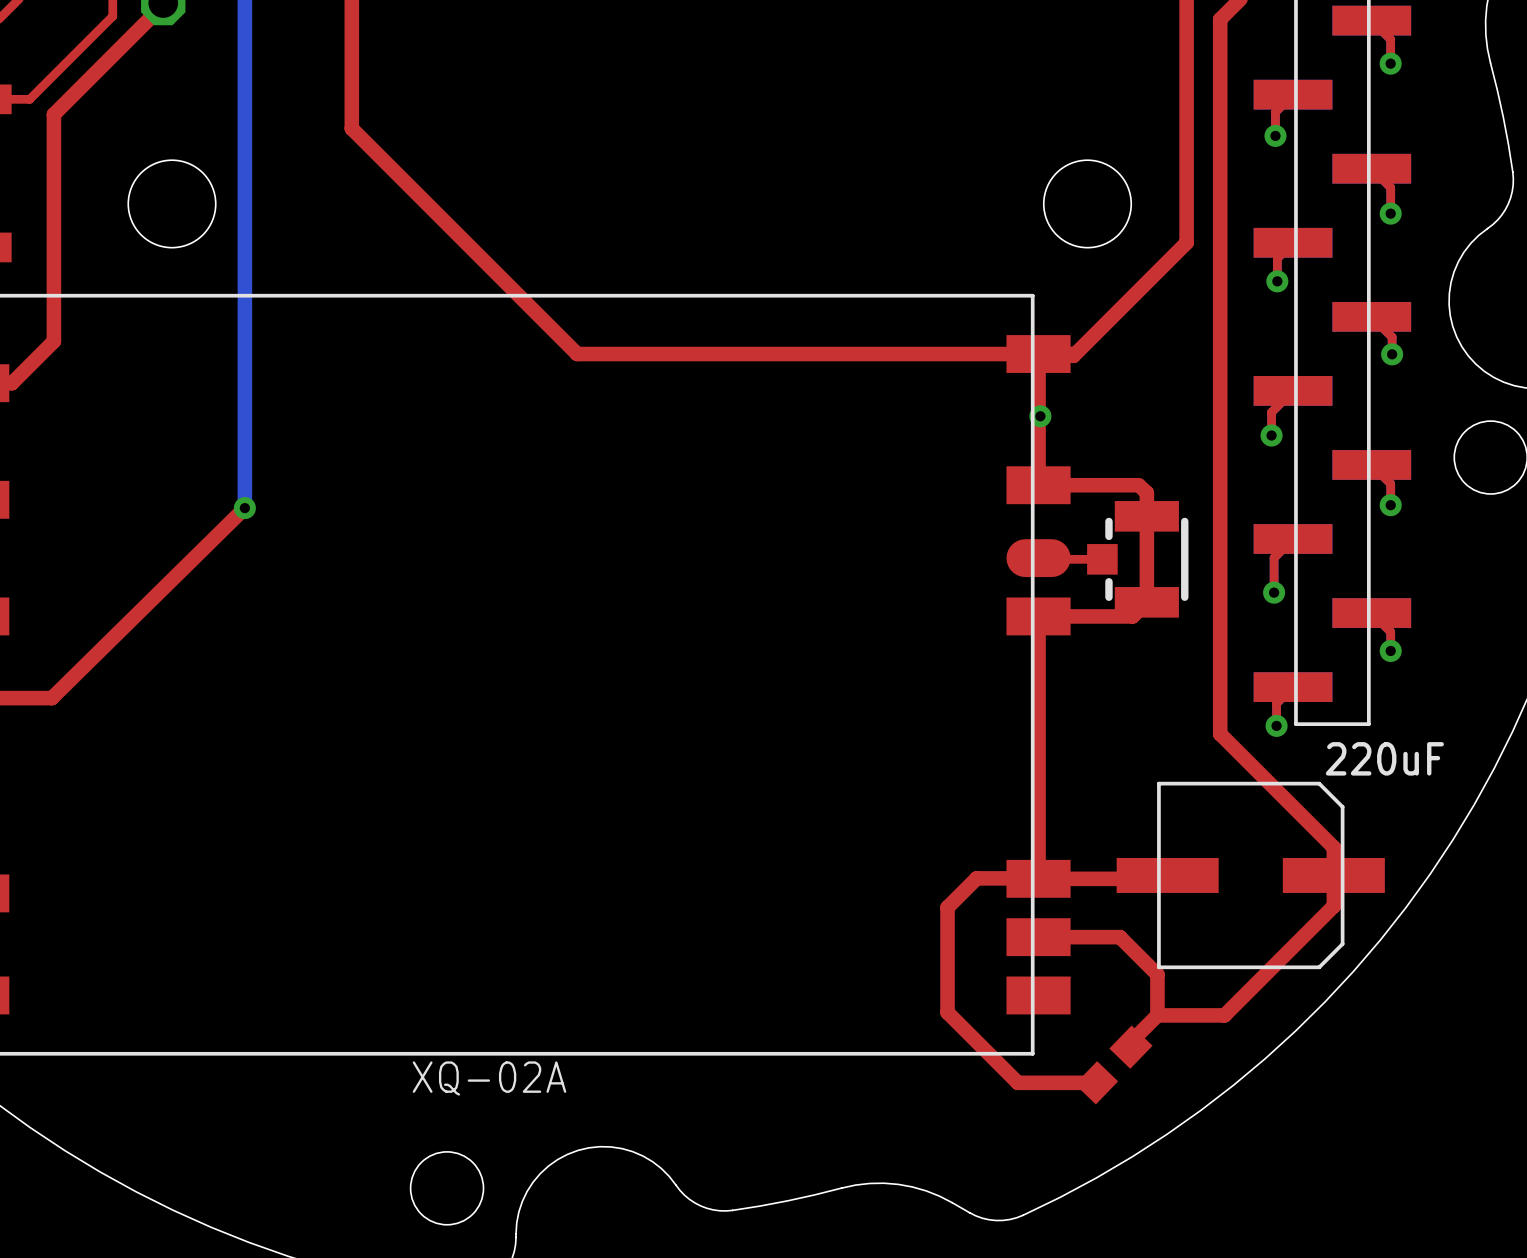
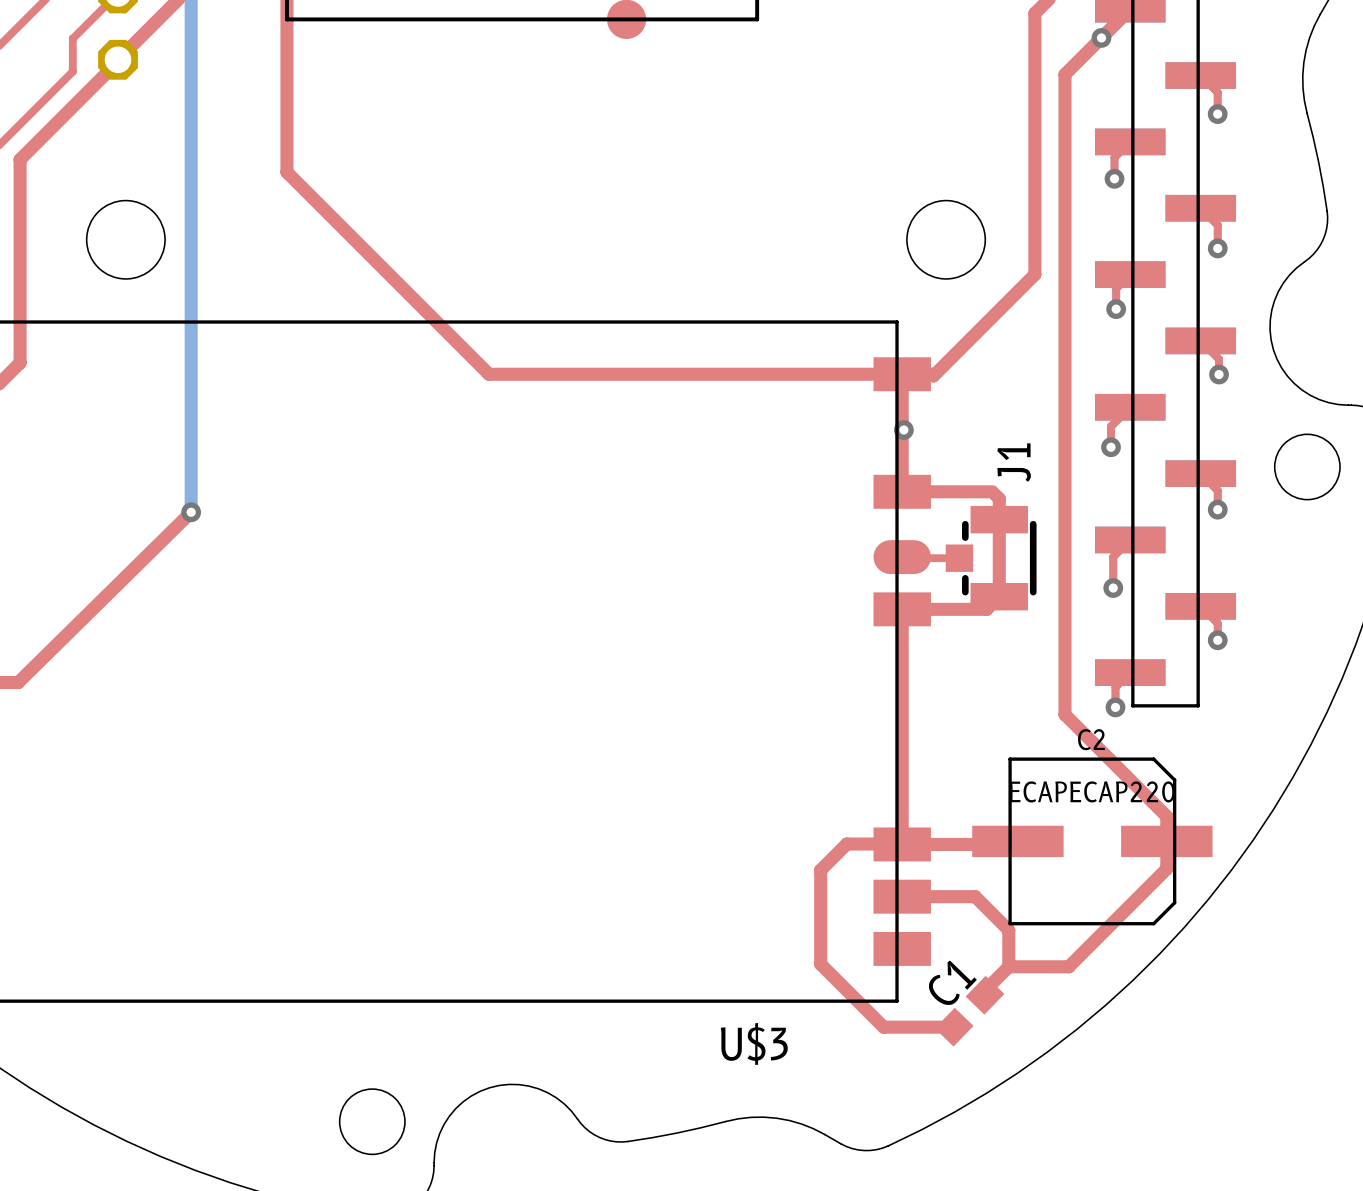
J1 name: none -> J1 (1014, 462)
C2 value: 220uF (1384, 758) -> ECAPECAP220 (1092, 791)
C2 name: none -> C2 (1091, 739)
C1 name: none -> C1 (952, 982)
XQ-02A name: XQ-02A (489, 1078) -> U$3 (754, 1043)

